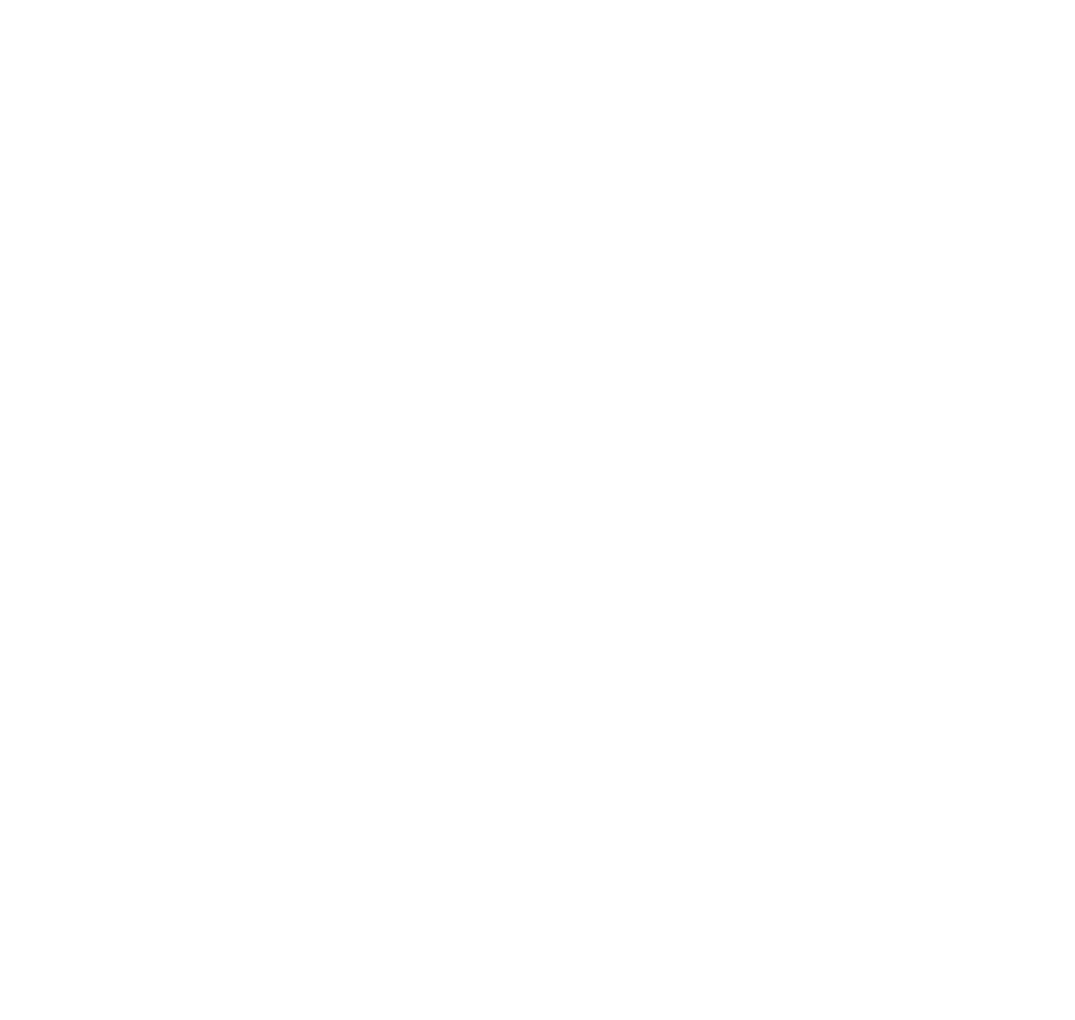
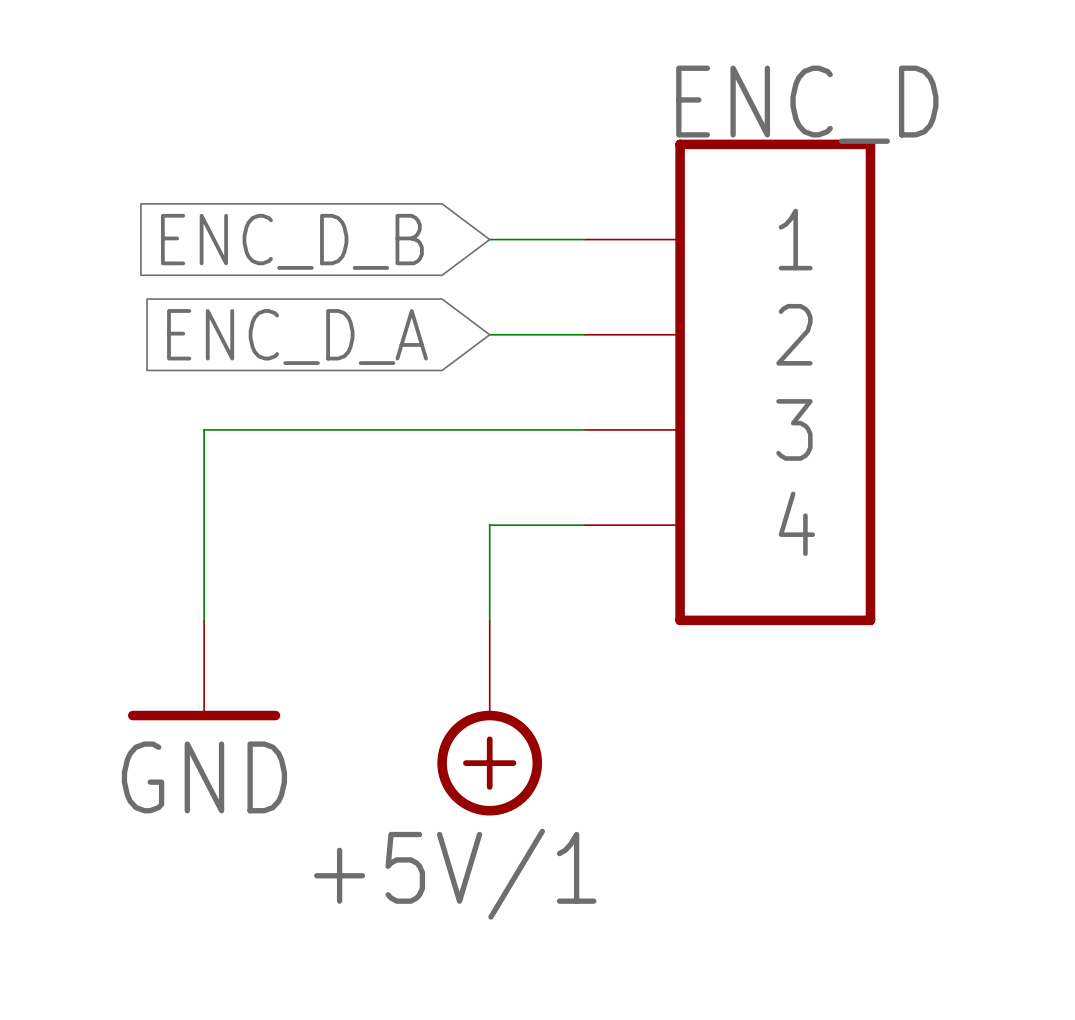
global label: none -> ENC_D_B (292, 241)
wire: none -> (489, 239) (584, 239)
global label: none -> ENC_D_A (297, 337)
wire: none -> (489, 334) (584, 334)
ENC_D: none -> (730, 382)
wire: none -> (584, 429) (204, 429) (204, 620)
wire: none -> (584, 525) (489, 525) (489, 620)
power symbol: none -> GND (204, 670)
power symbol: none -> +5V/1 (489, 717)

